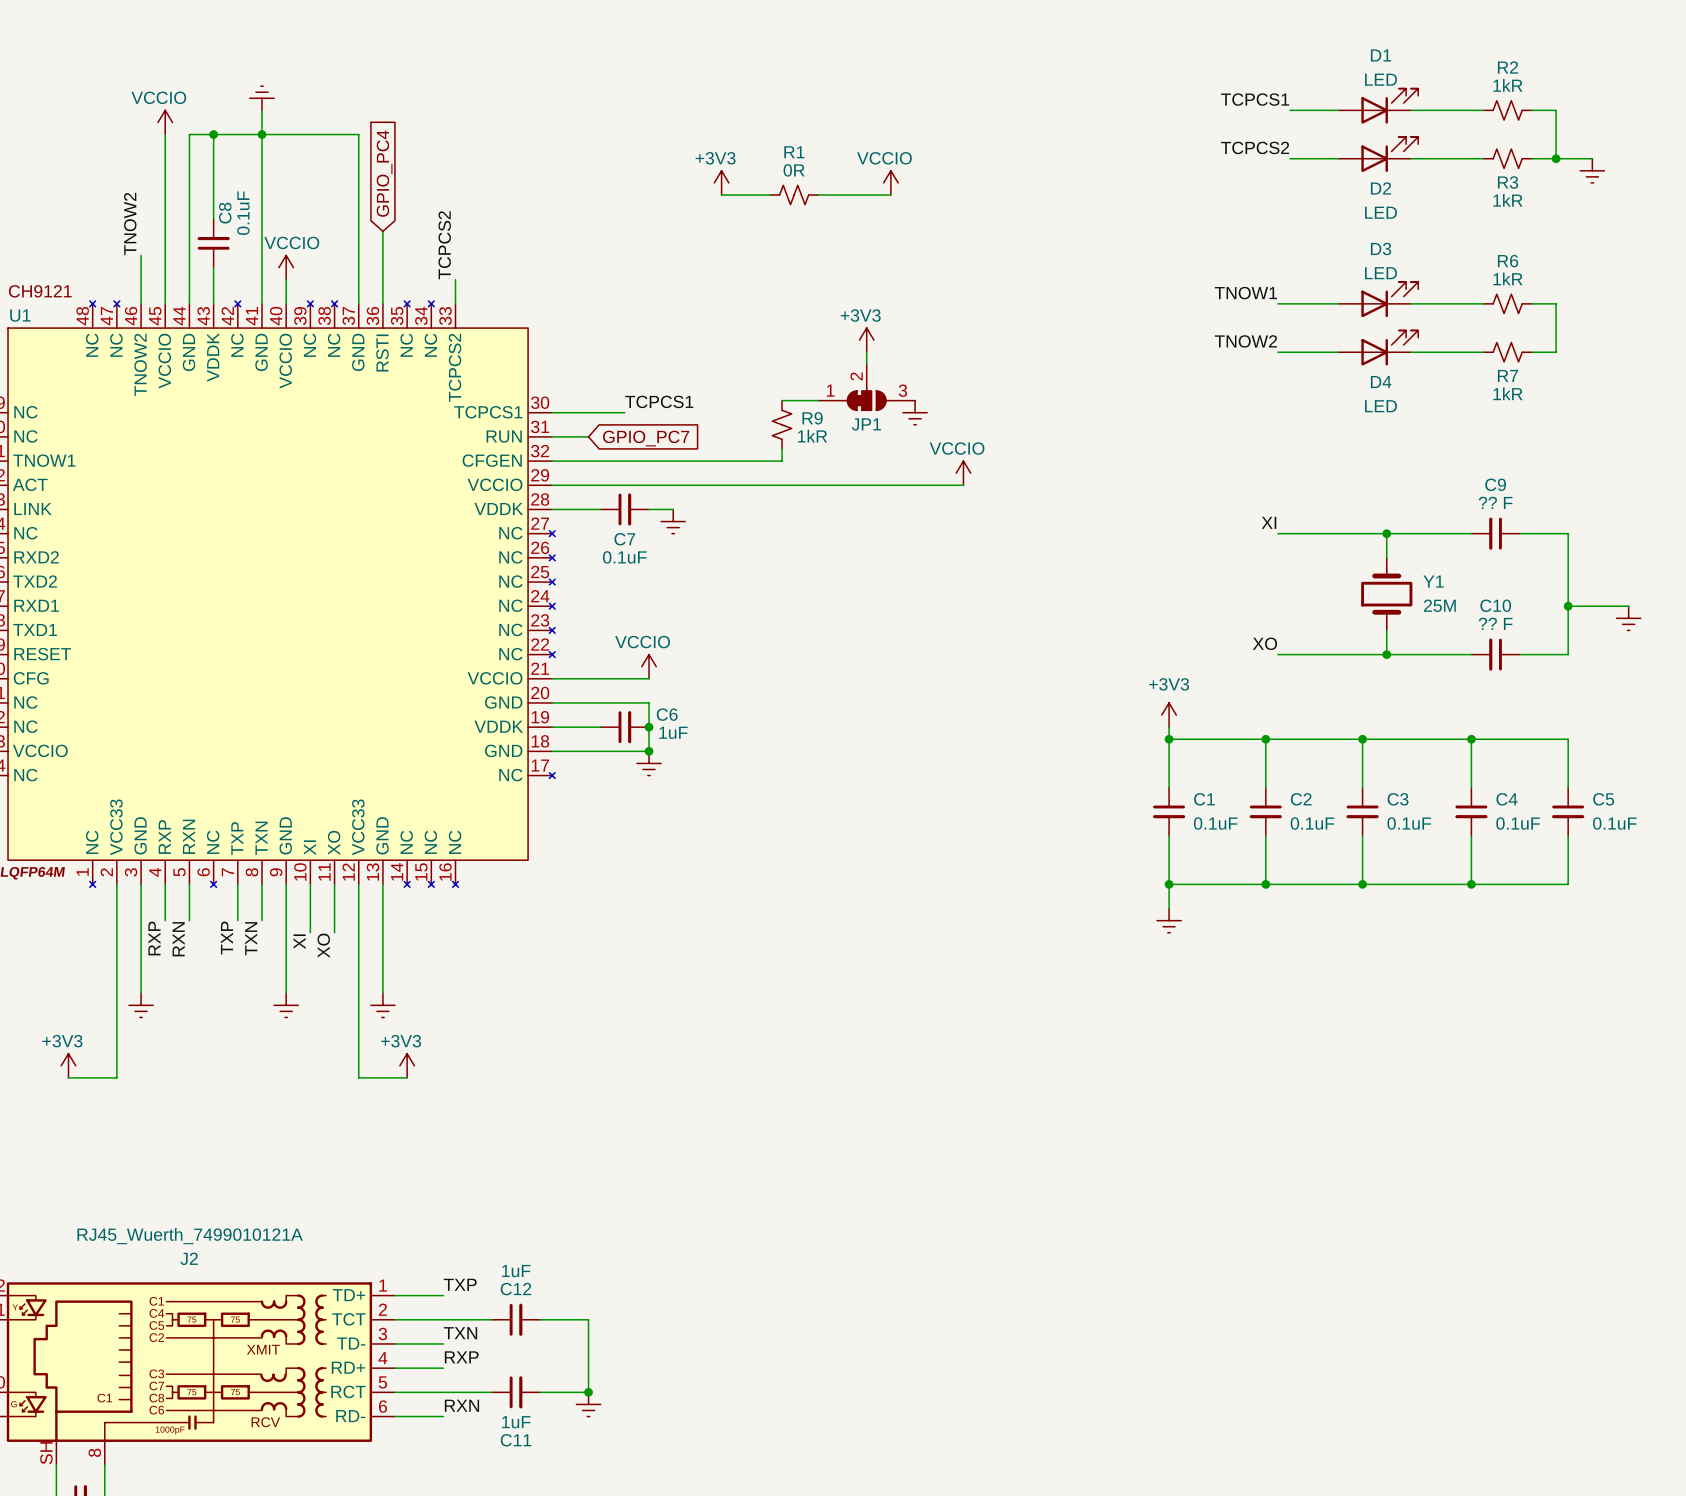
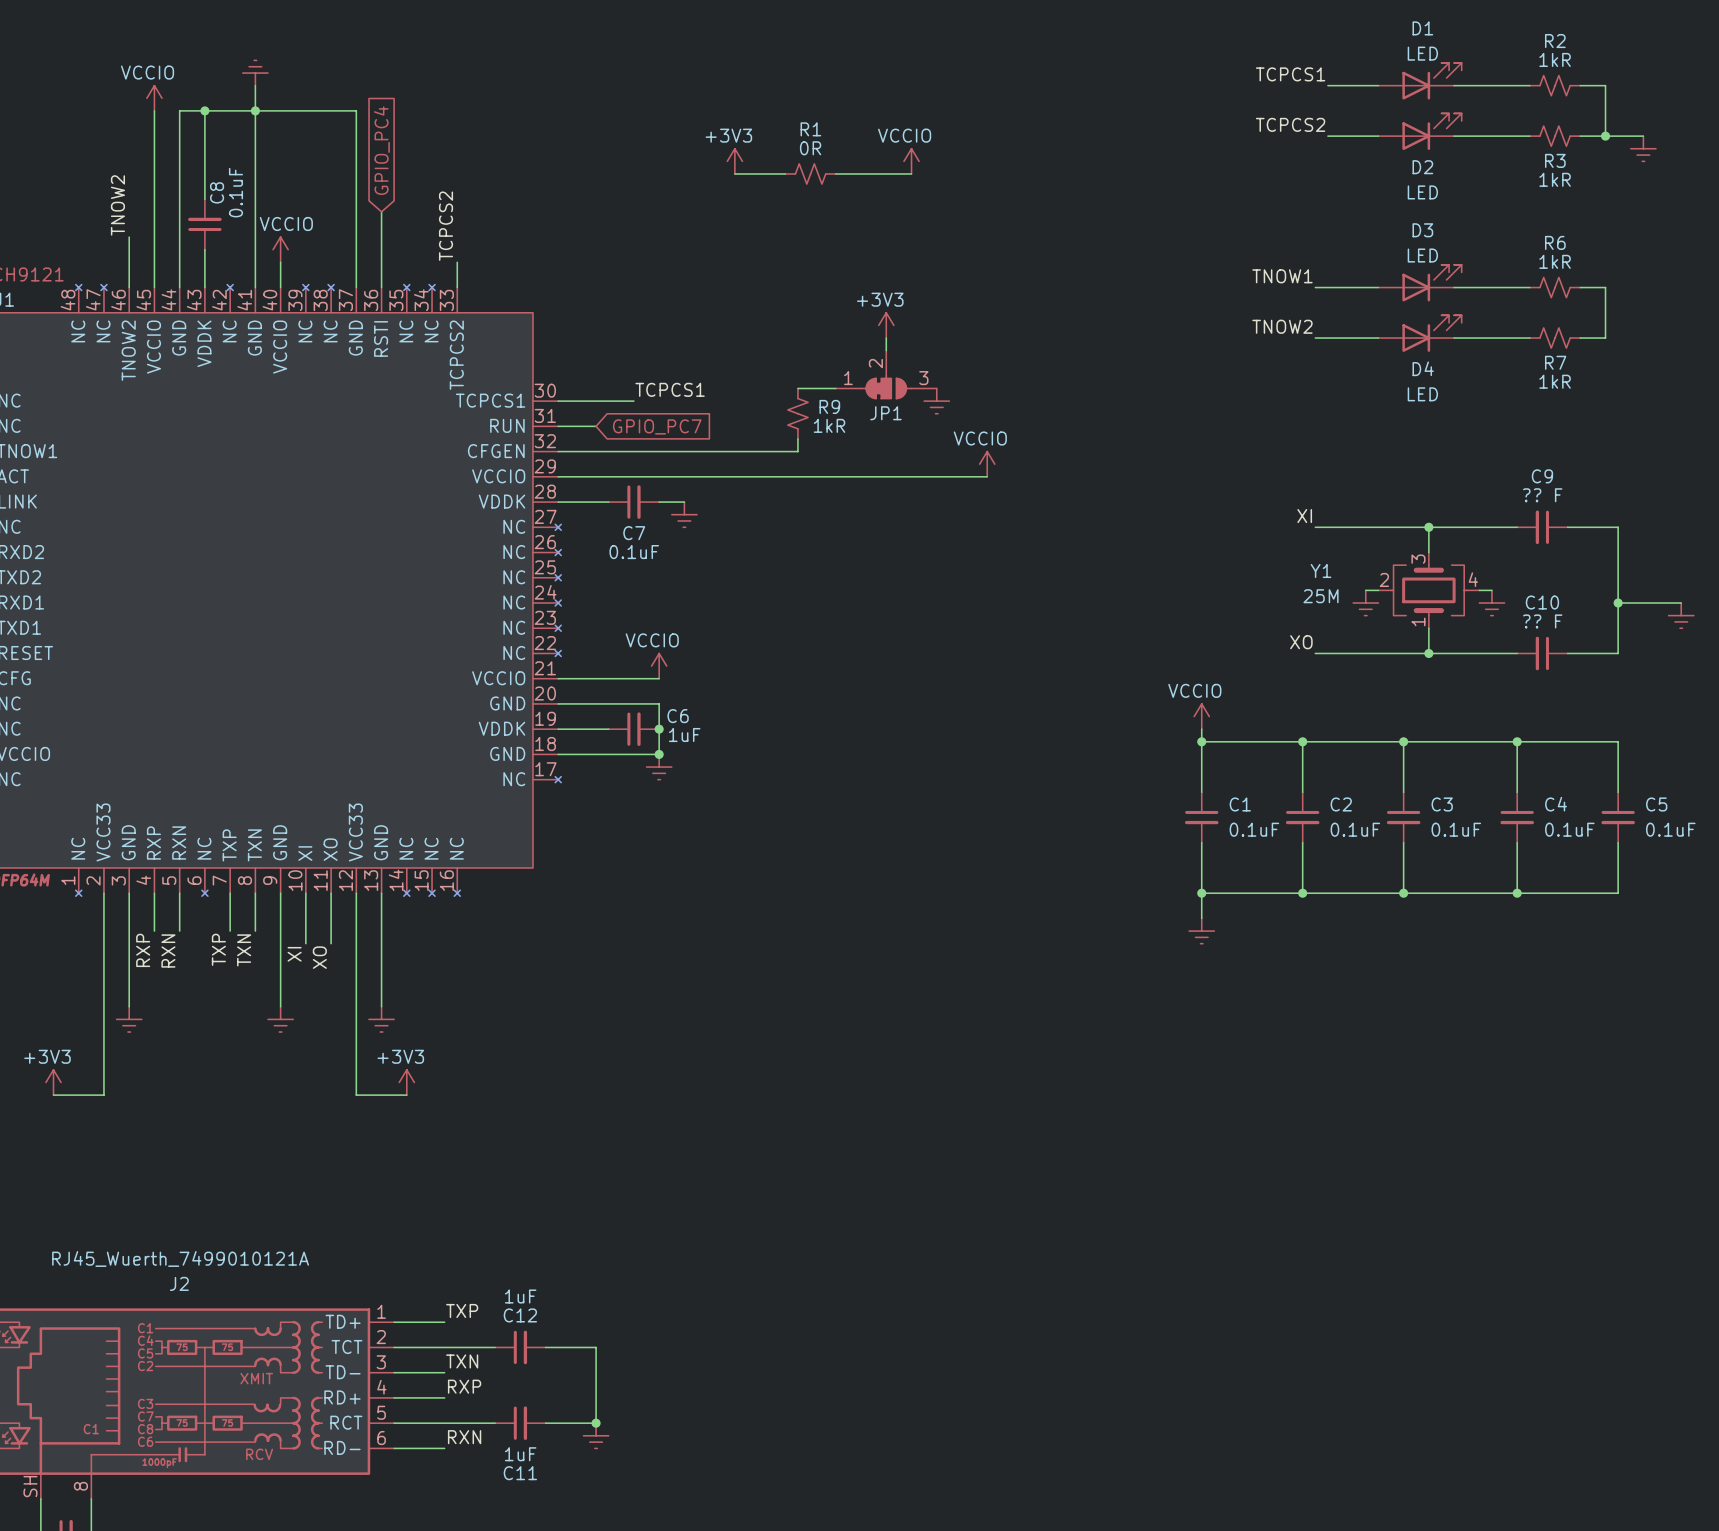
Y1 symbol: [1361, 557, 1413, 631] -> [1378, 552, 1480, 629]
Y1 name position: Y1 (1433, 581) -> Y1 (1321, 570)
wire: none -> (1365, 590) (1378, 590)
wire: none -> (1479, 590) (1491, 590)
Y1 value position: 25M (1439, 605) -> 25M (1321, 596)
power symbol: none -> (1365, 603)
power symbol: none -> (1491, 603)
power symbol: +3V3 (1169, 715) -> VCCIO (1201, 716)

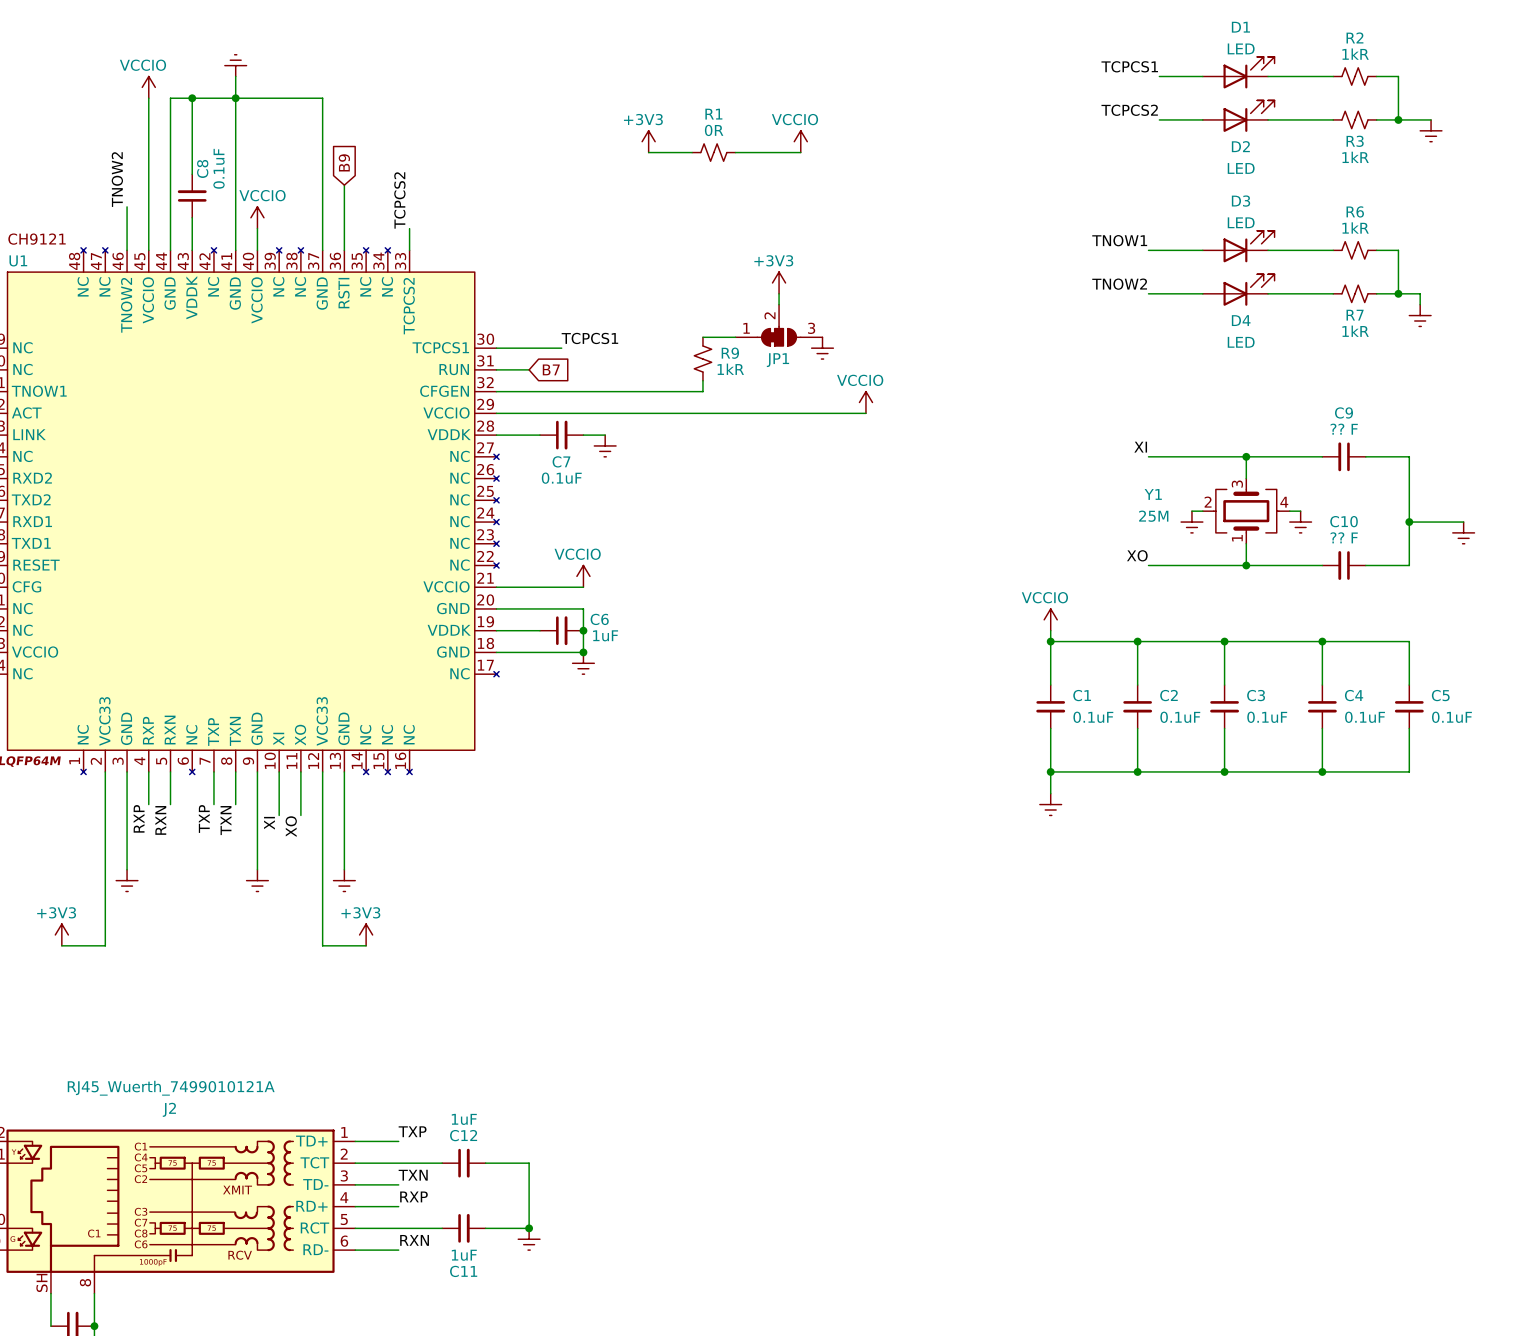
global label: GPIO_PC4 (381, 150) -> B9 (344, 162)
wire: none -> (1398, 293) (1420, 293) (1420, 304)
junction: none -> (1398, 293)
power symbol: none -> (1420, 315)
global label: GPIO_PC7 (657, 426) -> B7 (551, 369)

